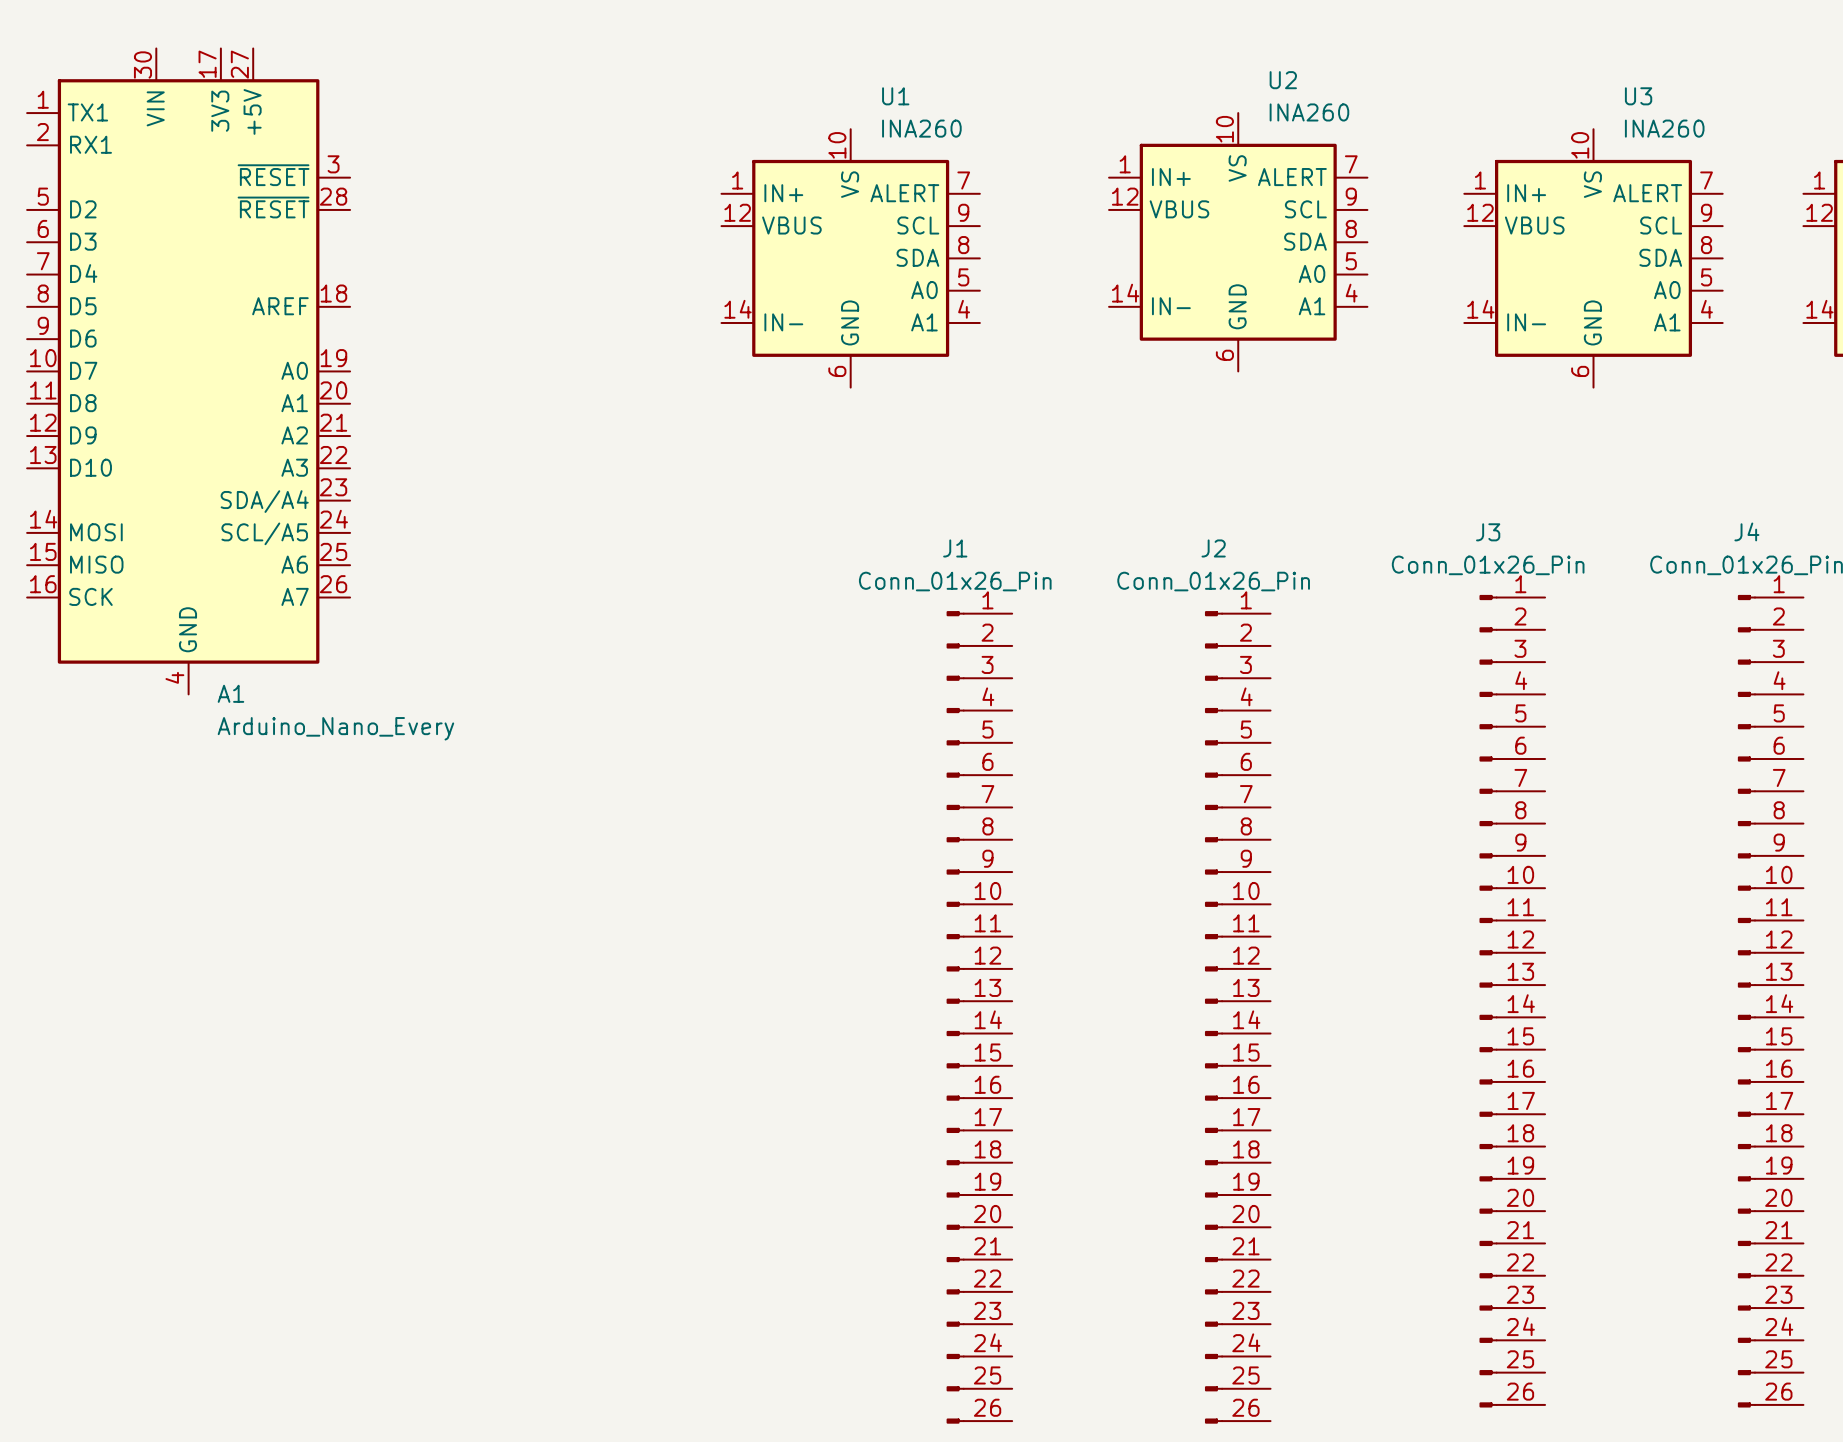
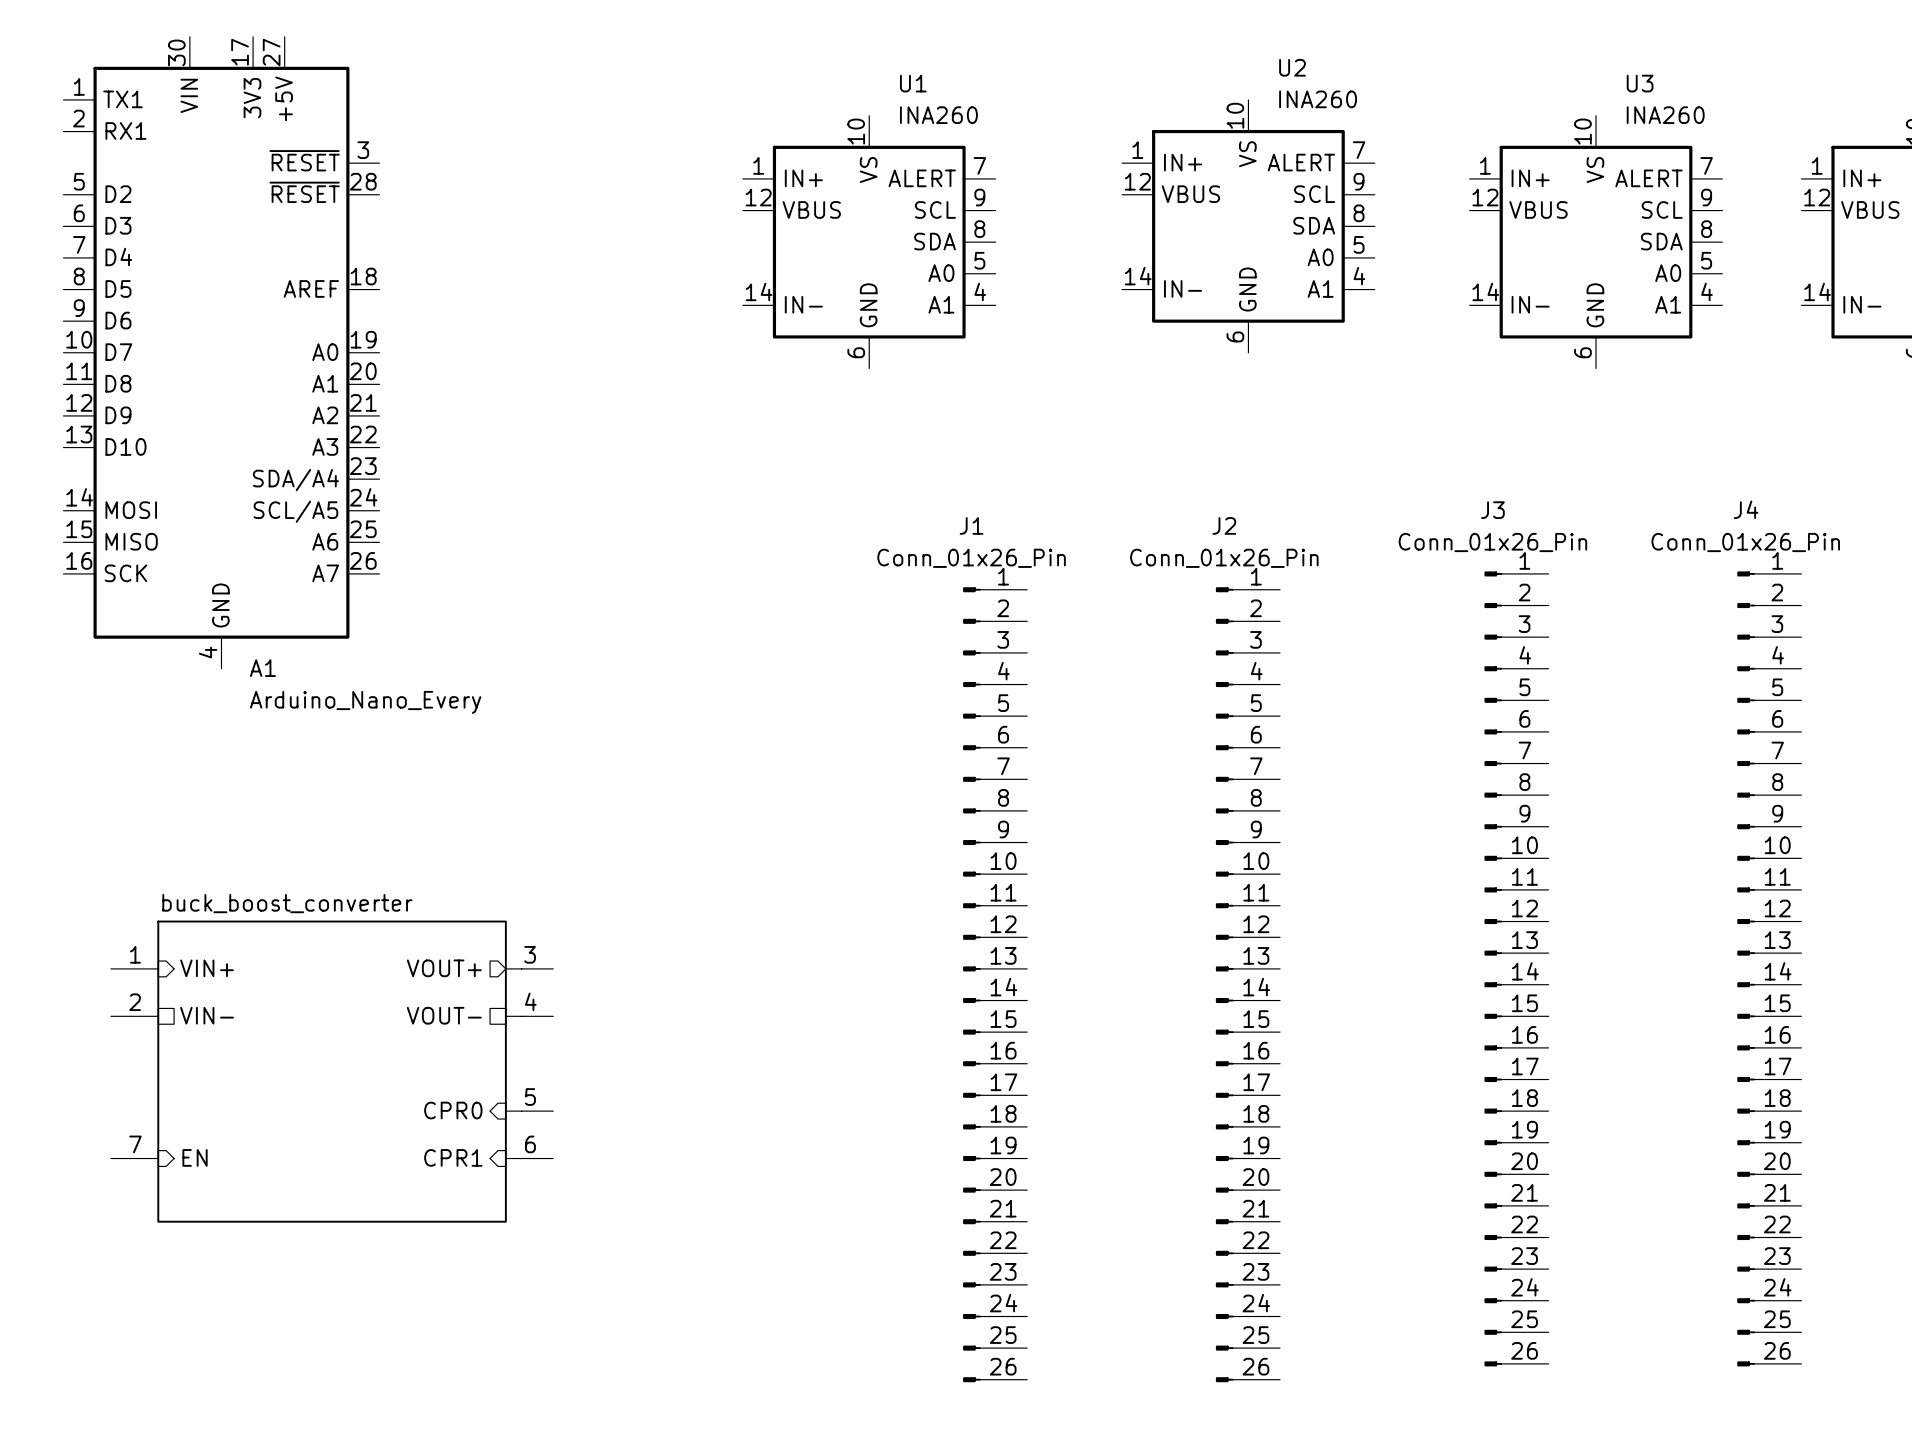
label: none -> 1 (135, 954)
label: none -> 3 (530, 954)
sheet pin: none -> VIN+ (207, 968)
sheet pin: none -> VOUT+ (444, 968)
wire: none -> (110, 968) (158, 968)
wire: none -> (505, 968) (553, 968)
label: none -> 4 (530, 1001)
label: none -> 2 (135, 1002)
wire: none -> (110, 1016) (158, 1016)
sheet pin: none -> VIN- (207, 1015)
sheet pin: none -> VOUT- (444, 1015)
wire: none -> (505, 1016) (553, 1016)
sheet buck_boost_converter: none -> (332, 1071)
label: none -> 5 (530, 1097)
sheet pin: none -> CPR0 (453, 1110)
wire: none -> (505, 1111) (553, 1111)
label: none -> 7 (135, 1144)
label: none -> 6 (530, 1144)
sheet pin: none -> EN (195, 1157)
sheet pin: none -> CPR1 (453, 1157)
wire: none -> (110, 1158) (158, 1158)
wire: none -> (505, 1158) (553, 1158)

